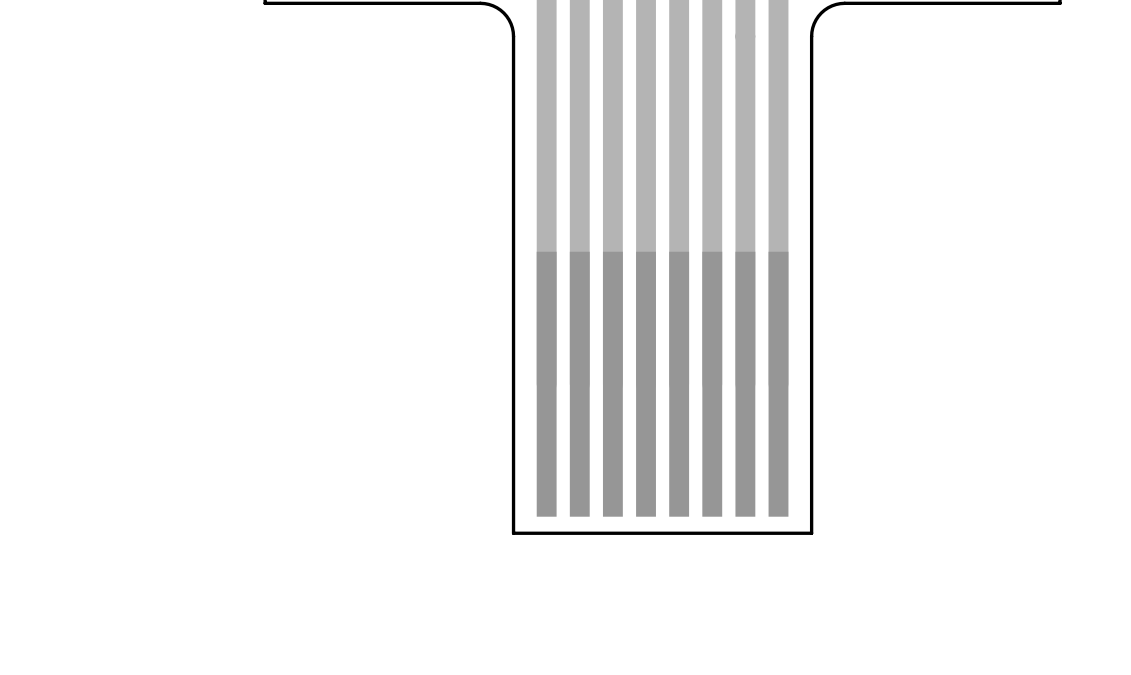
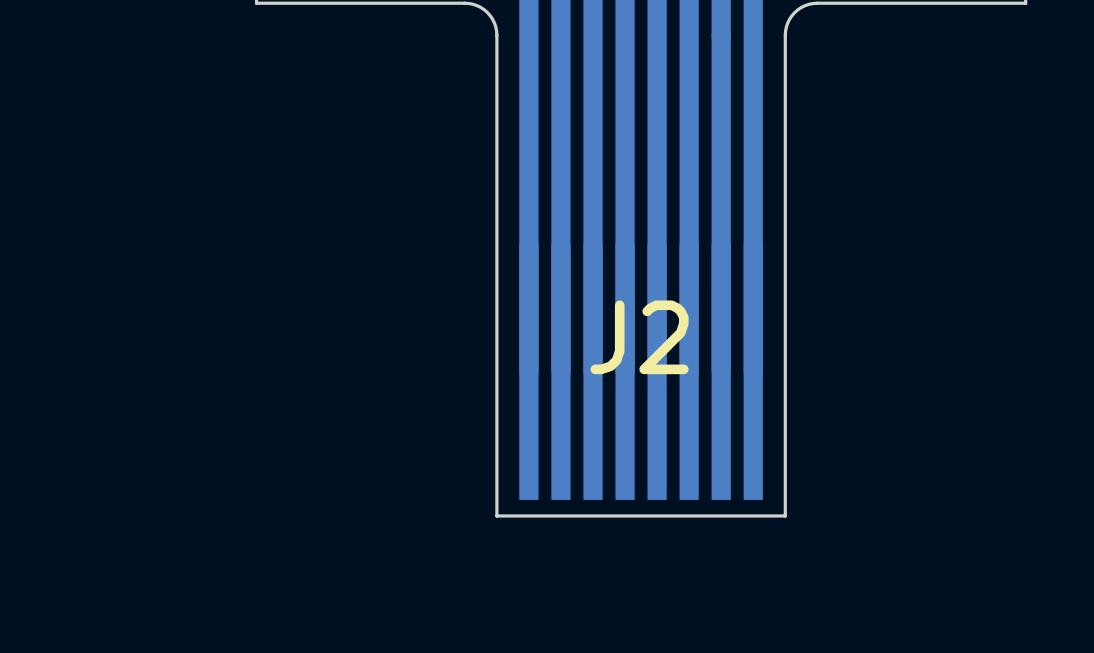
J2 name: none -> J2 (639, 337)

